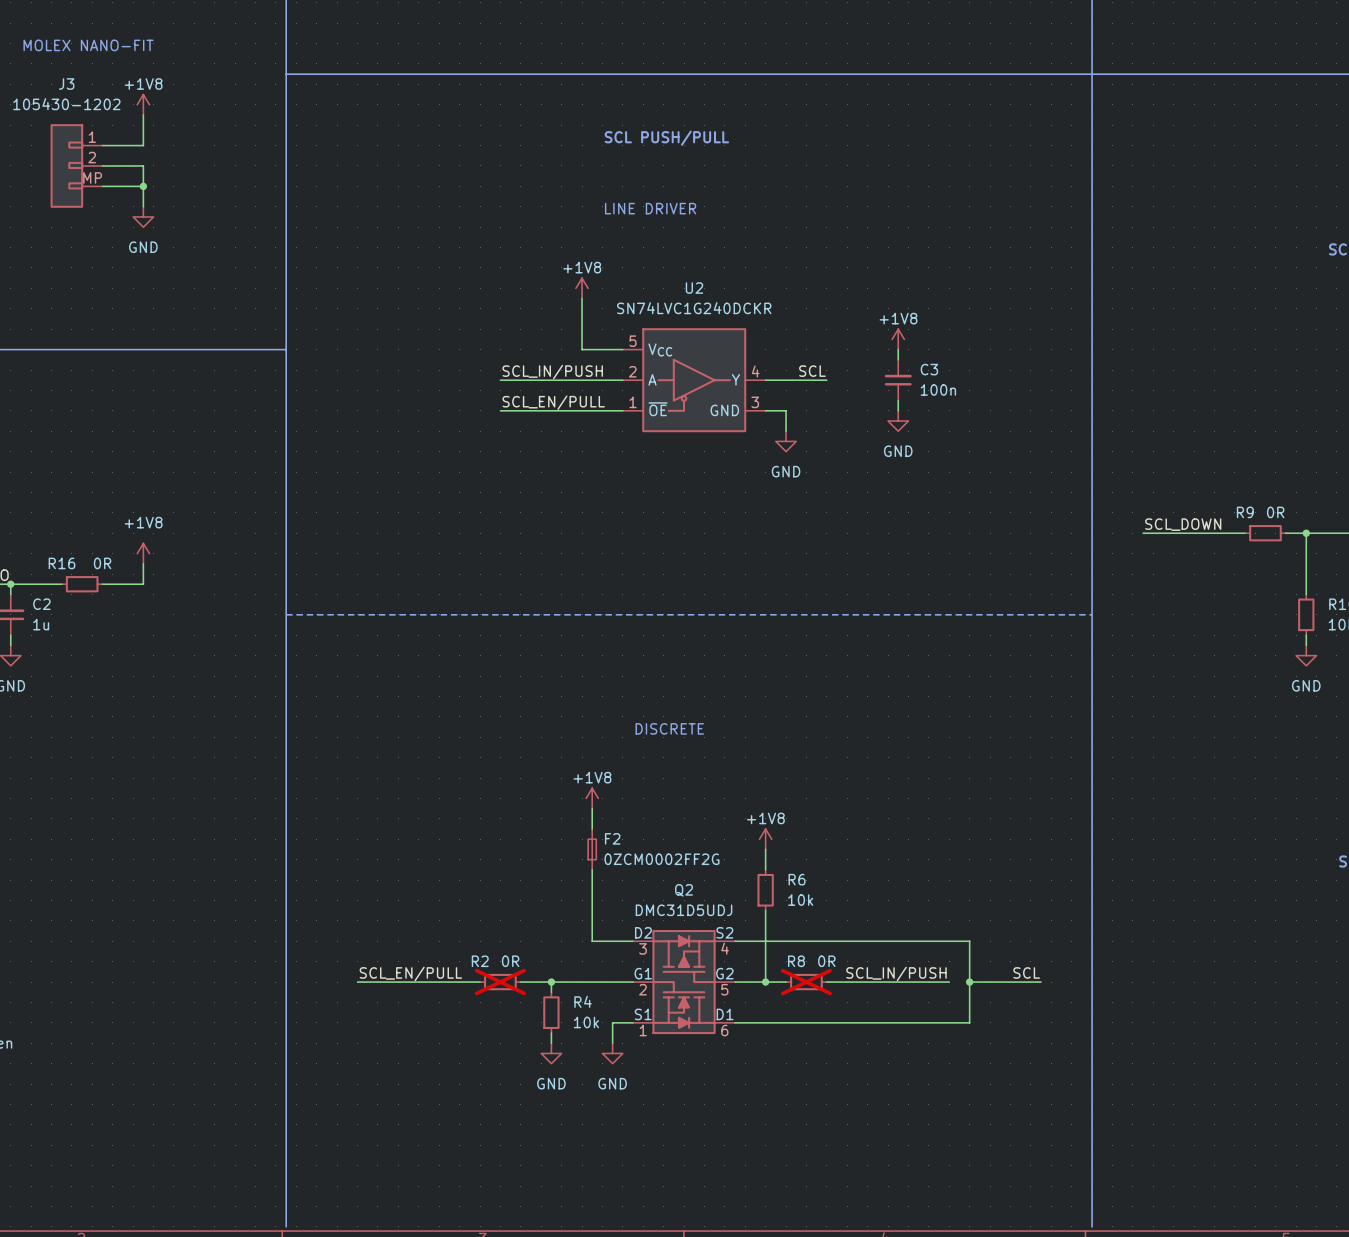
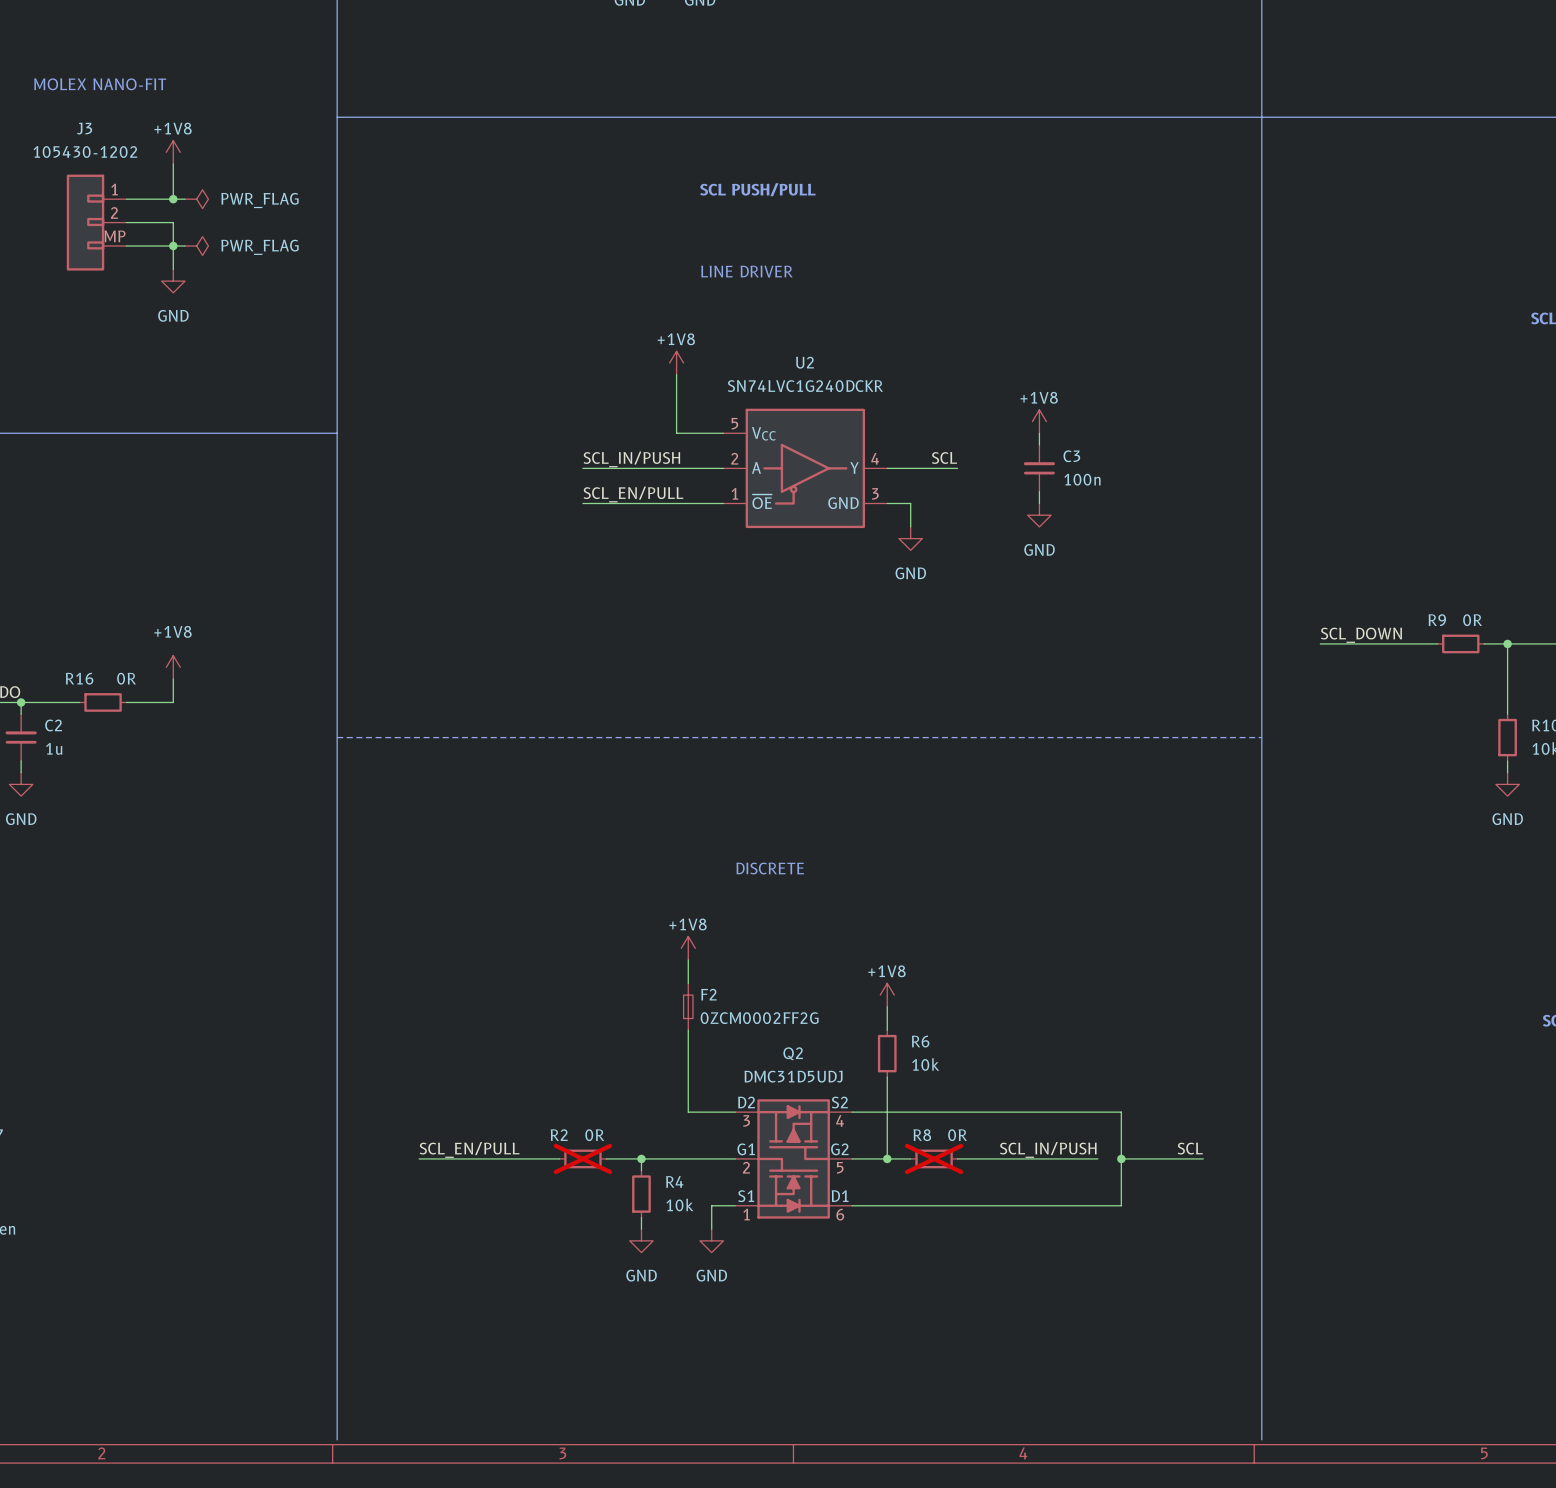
wire: none -> (173, 199) (185, 199)
junction: none -> (173, 199)
power symbol: none -> PWR_FLAG (196, 199)
wire: none -> (173, 246) (185, 246)
power symbol: none -> PWR_FLAG (196, 246)

